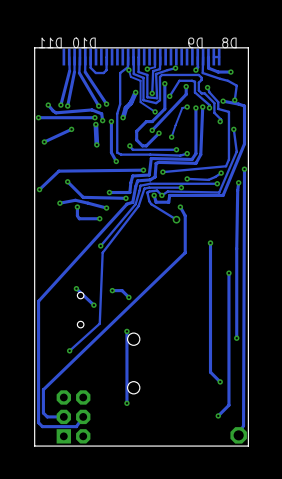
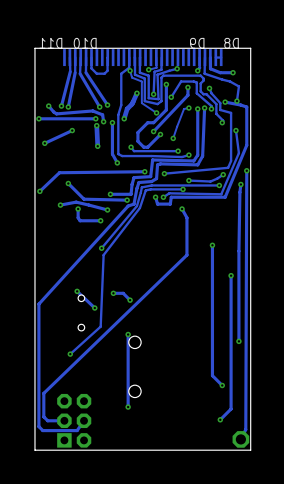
track: (161, 195) (157, 190) (147, 192) (151, 204) (176, 219) -> none
via: (176, 219) -> none

